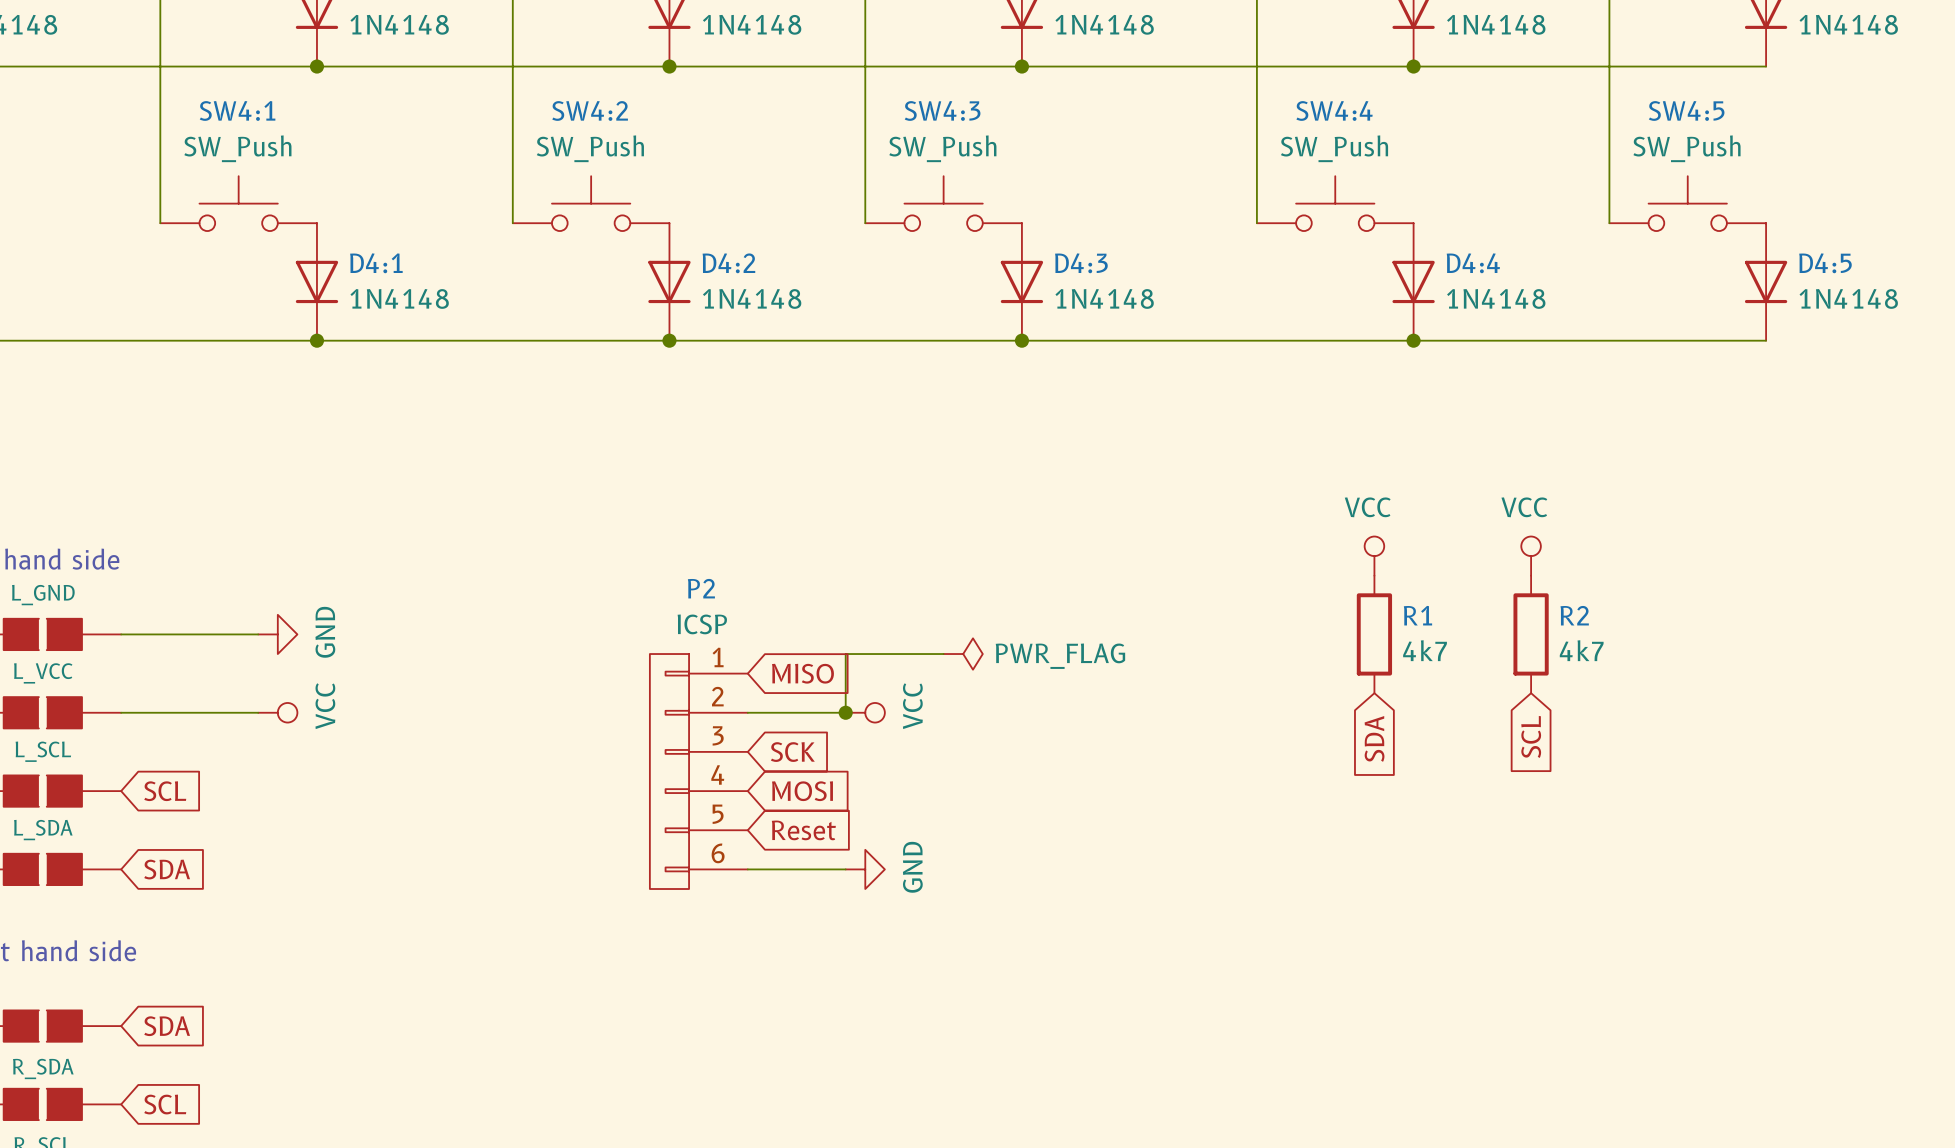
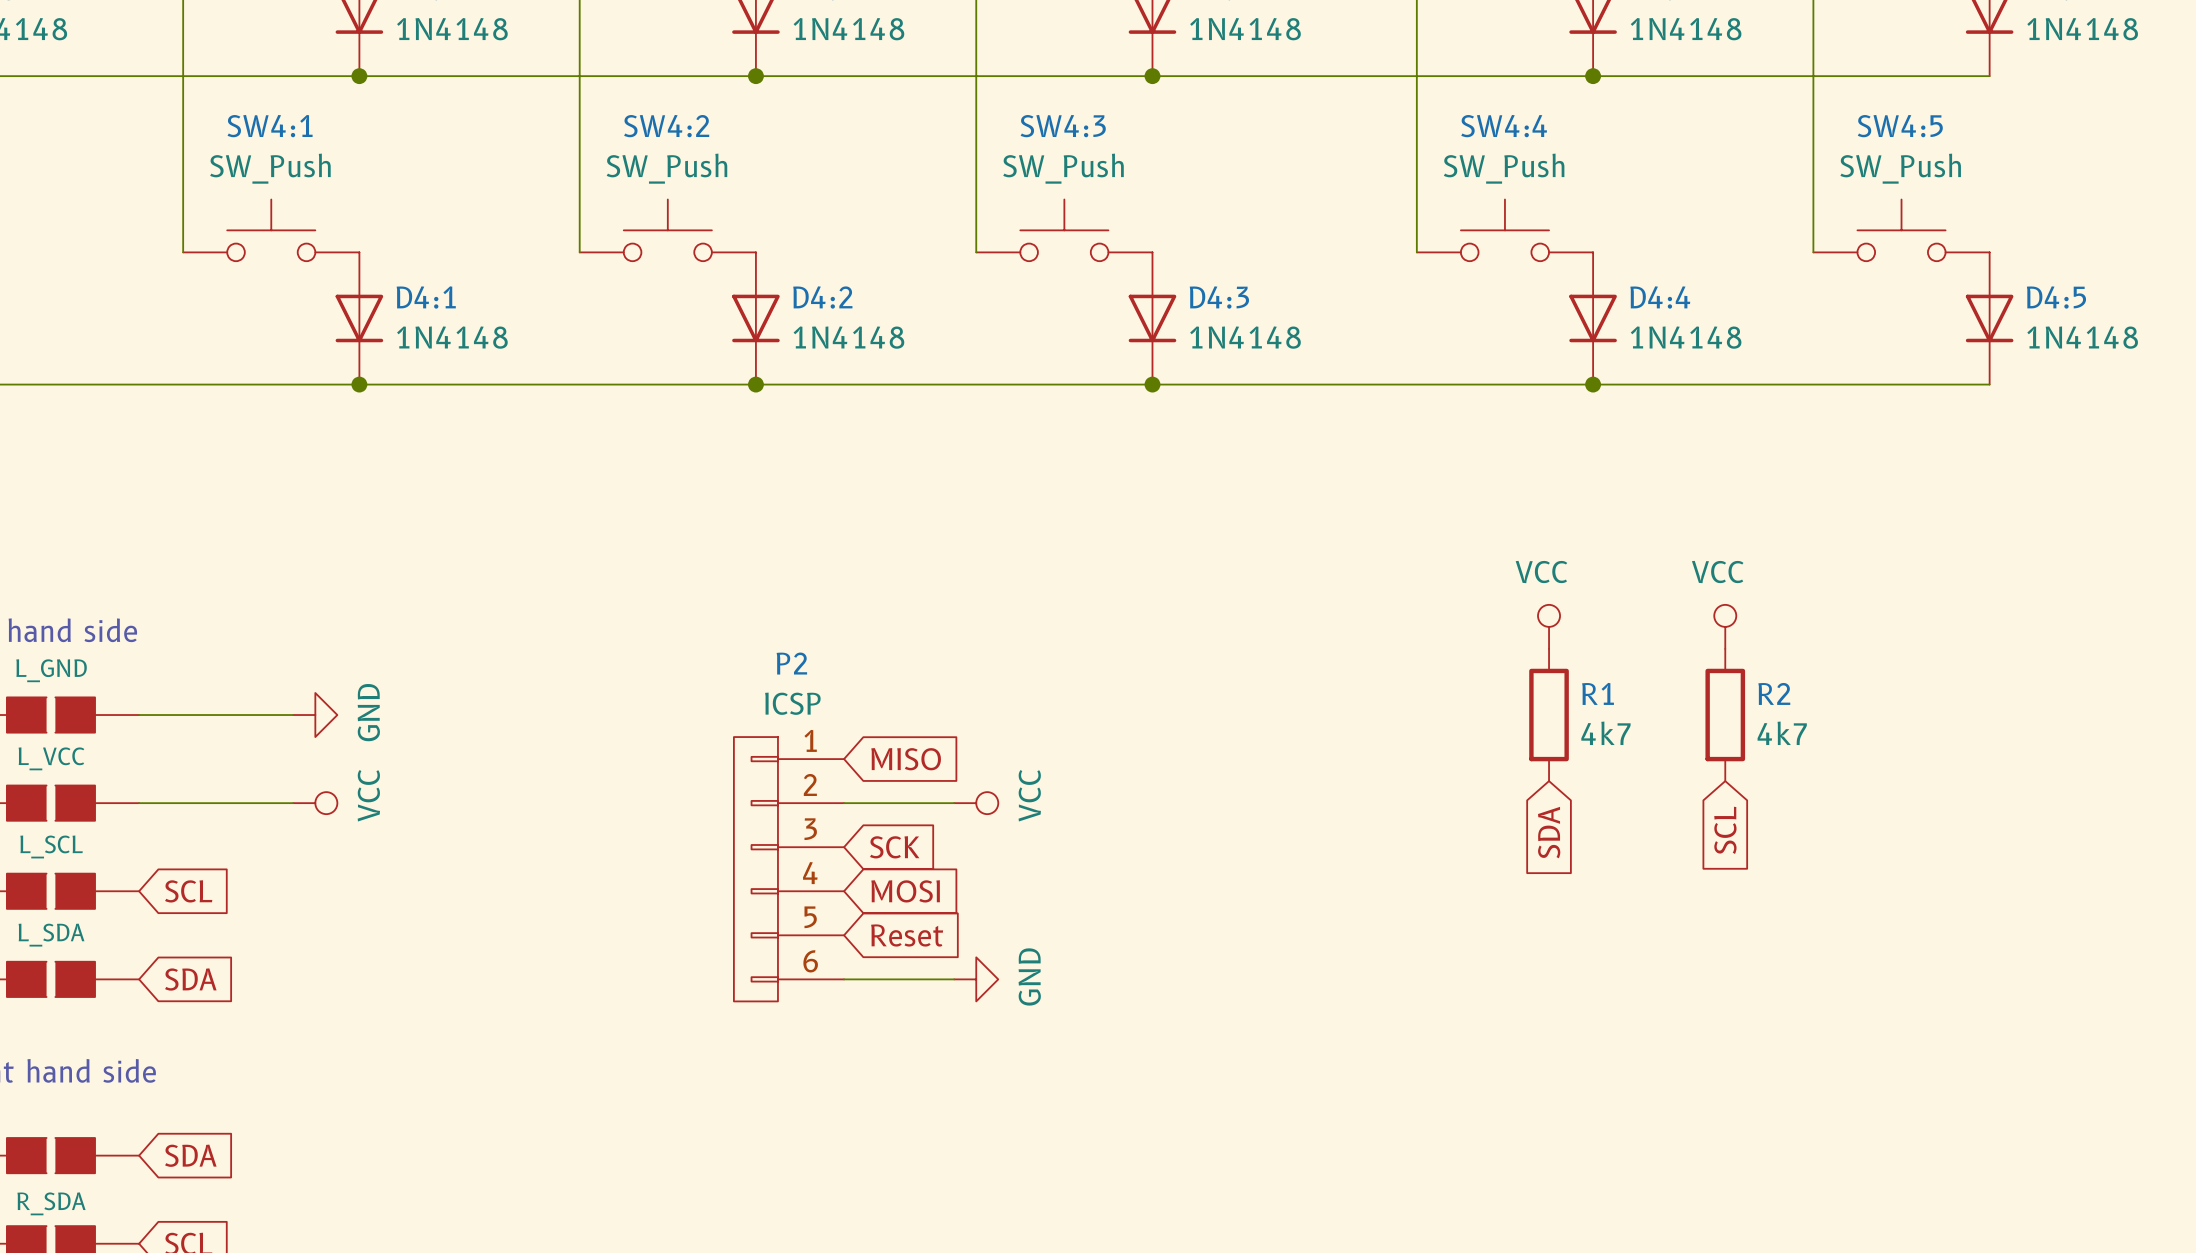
wire: (943, 654) (845, 654) (845, 712) -> none
power symbol: PWR_FLAG (963, 654) -> none
junction: (845, 712) -> none

